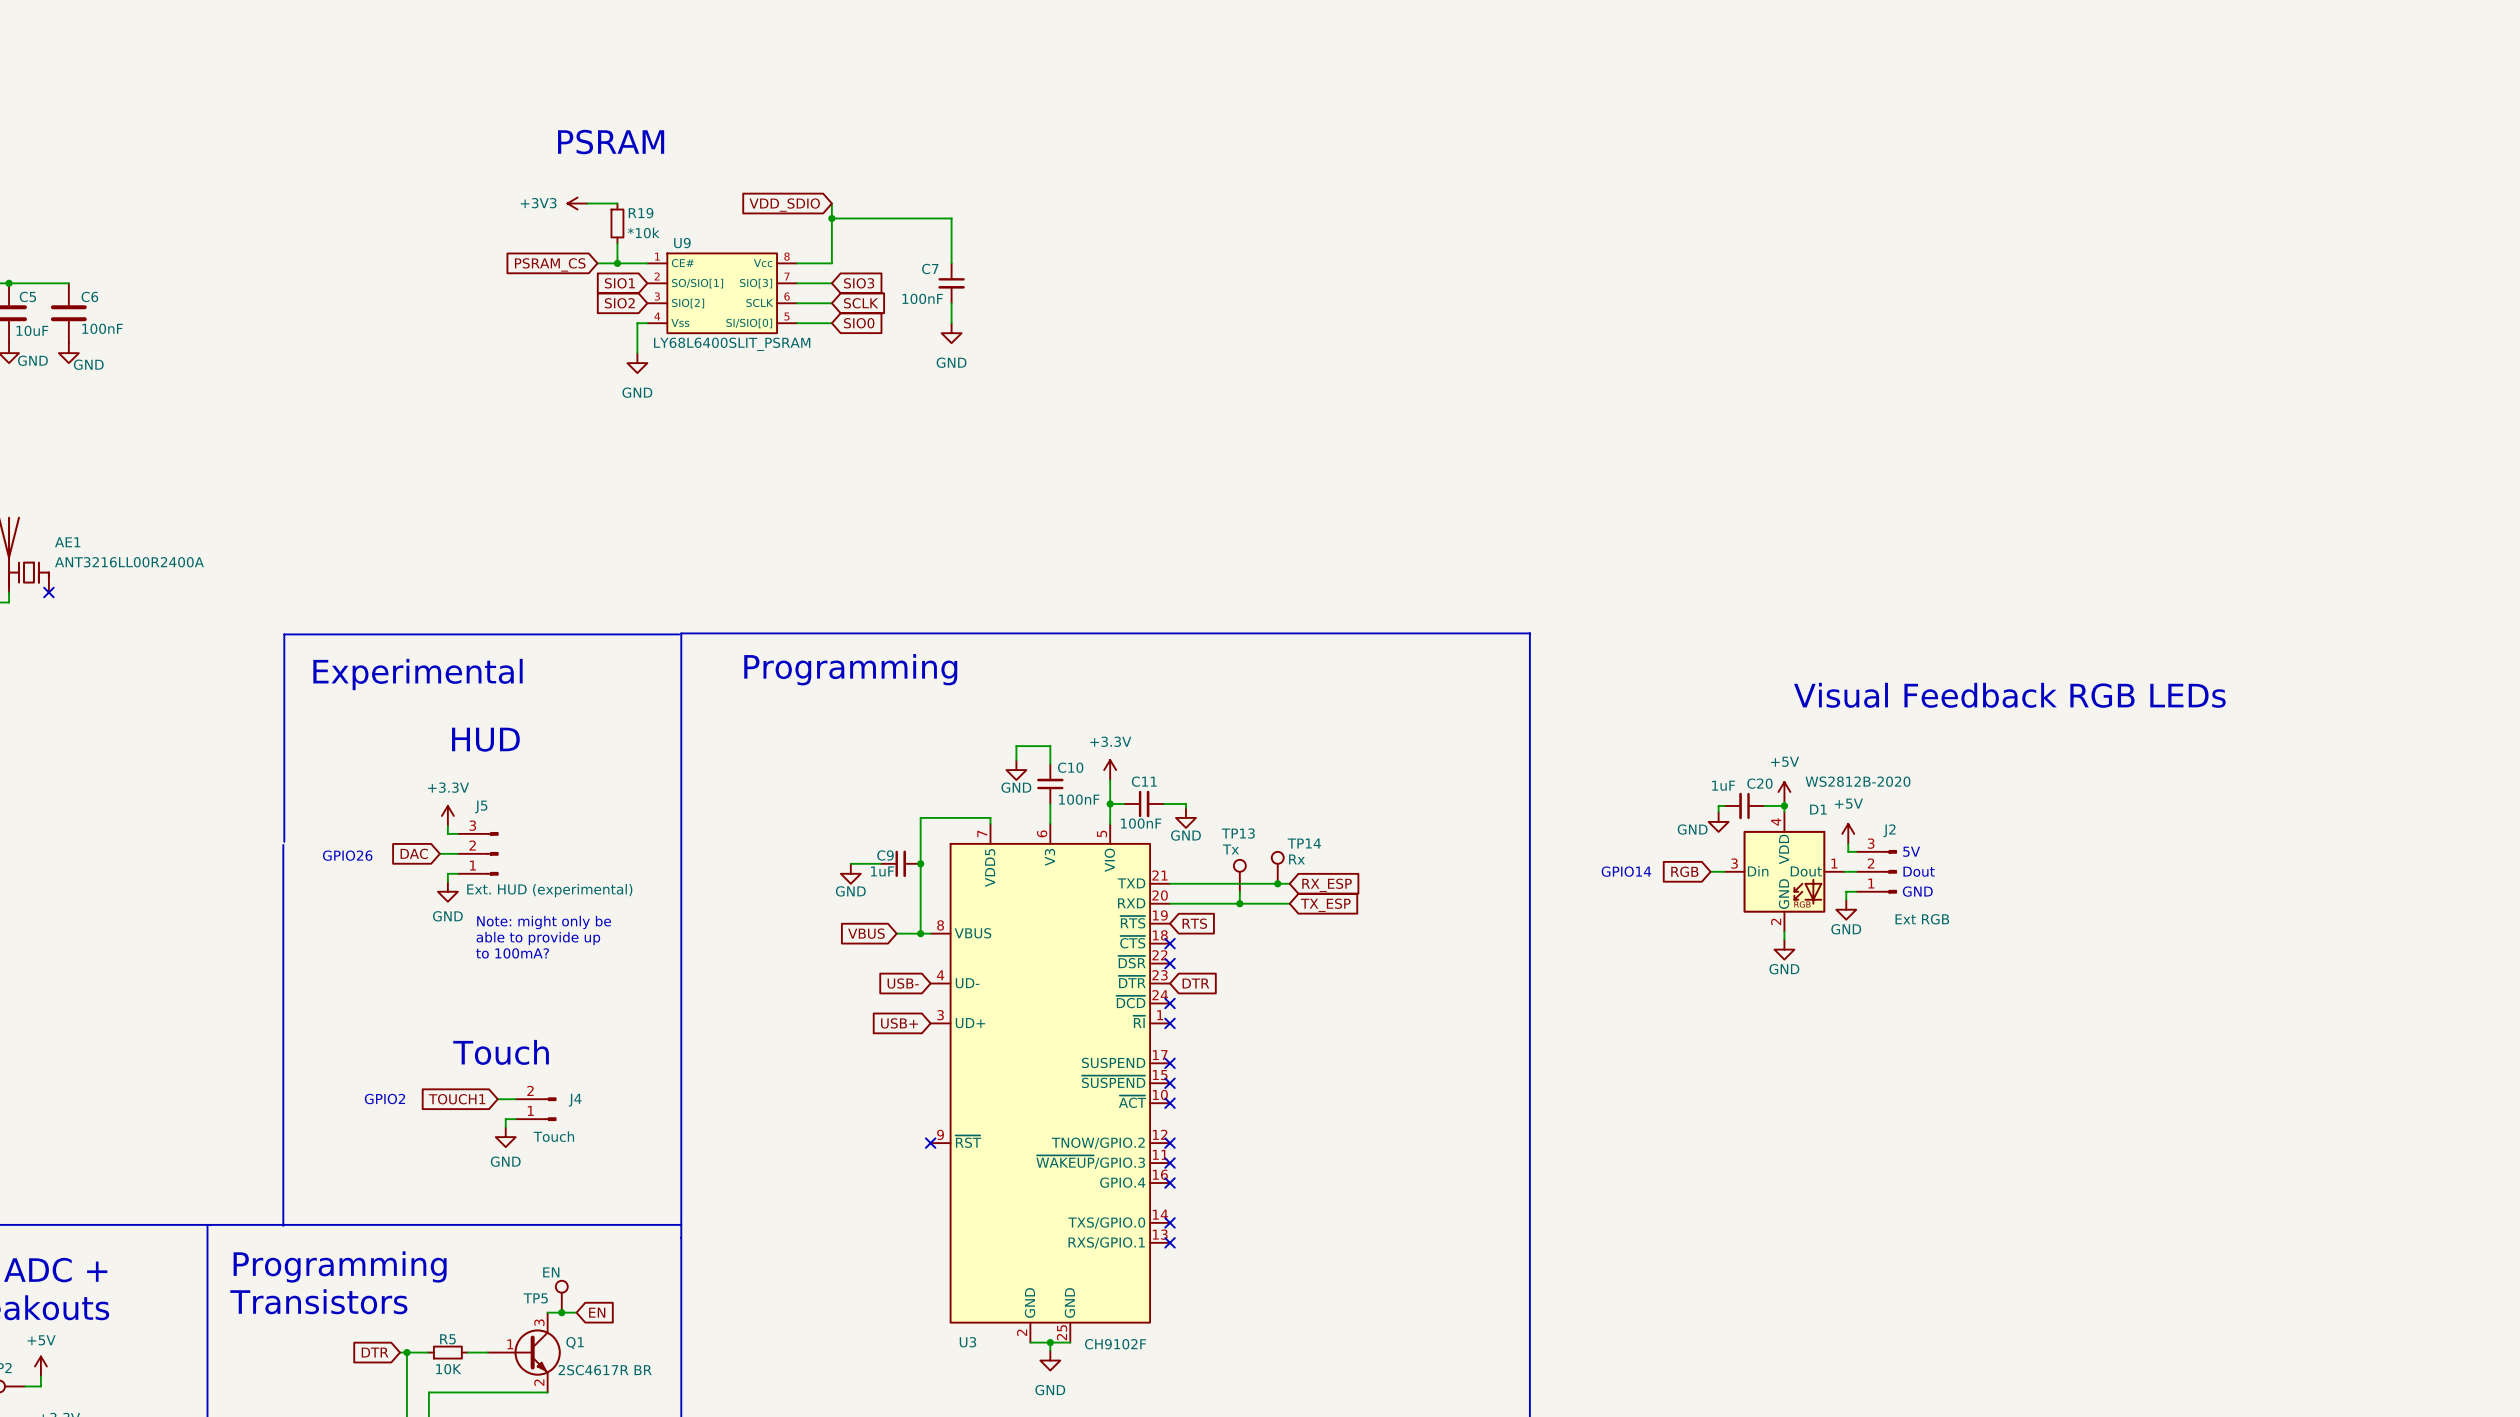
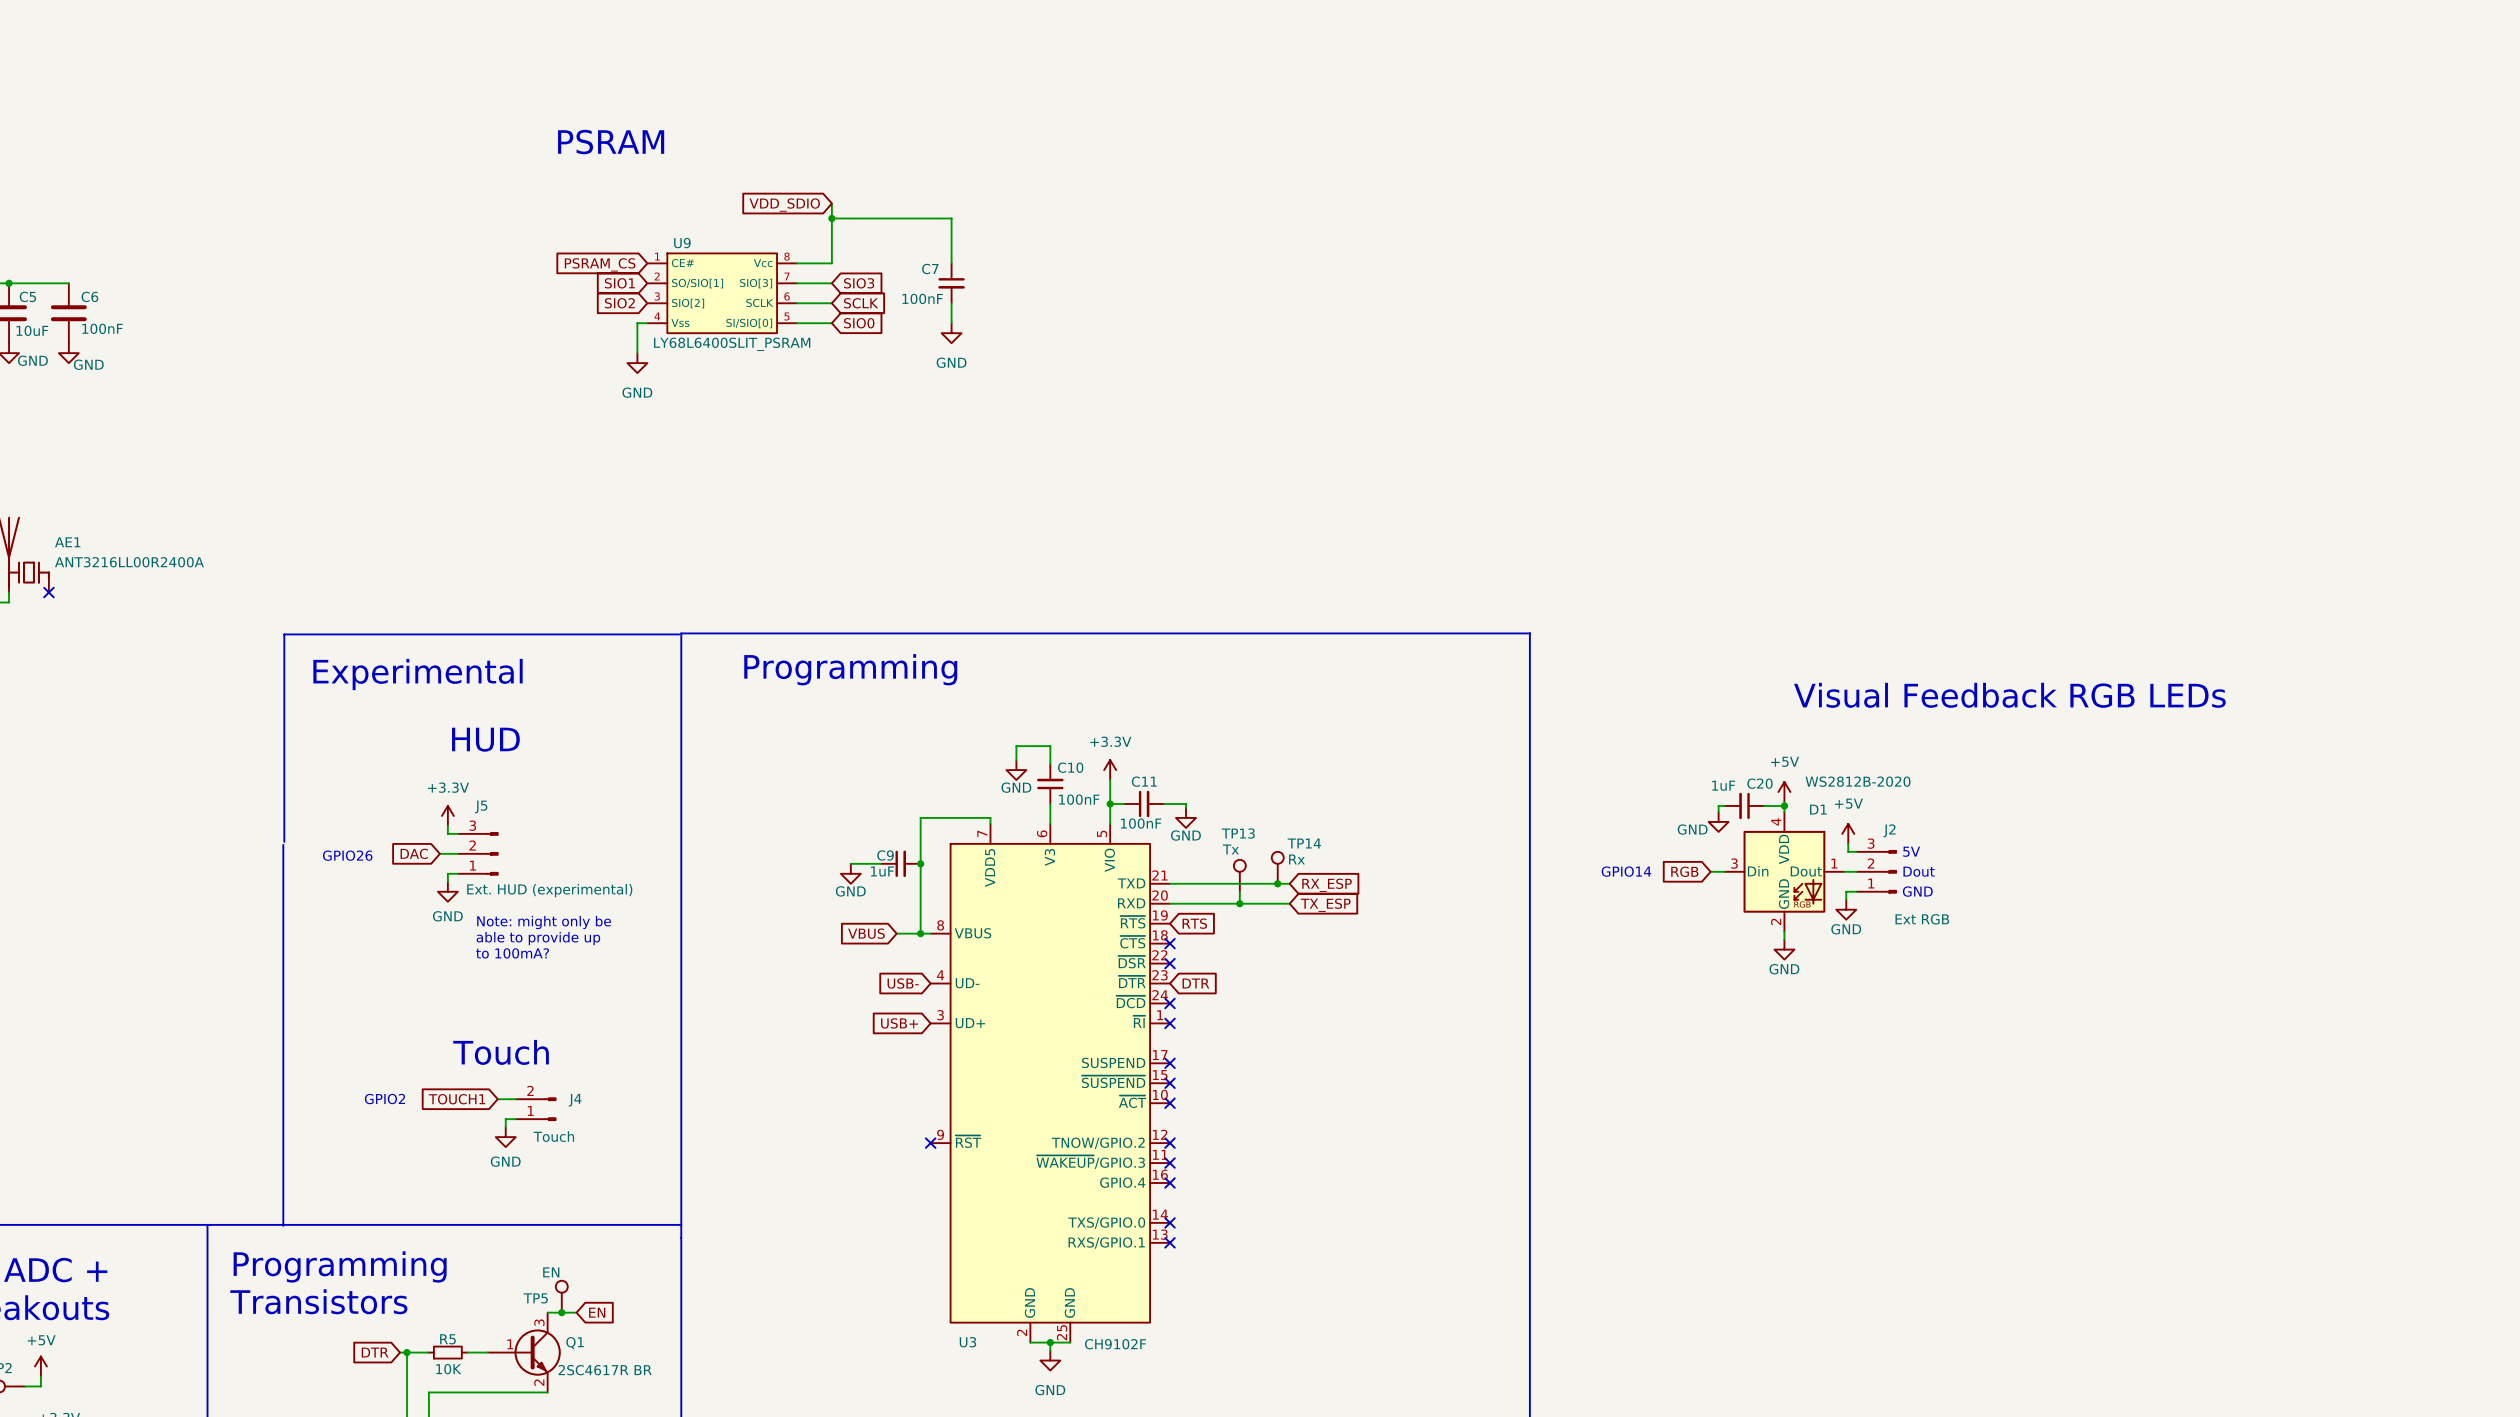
power symbol: +3V3 (577, 203) -> none
wire: (587, 203) (617, 203) -> none
R19: *10k (617, 223) -> none
wire: (617, 243) (617, 263) -> none
wire: (597, 263) (647, 263) -> none
junction: (617, 263) -> none
global label position: PSRAM_CS (550, 264) -> PSRAM_CS (600, 264)

